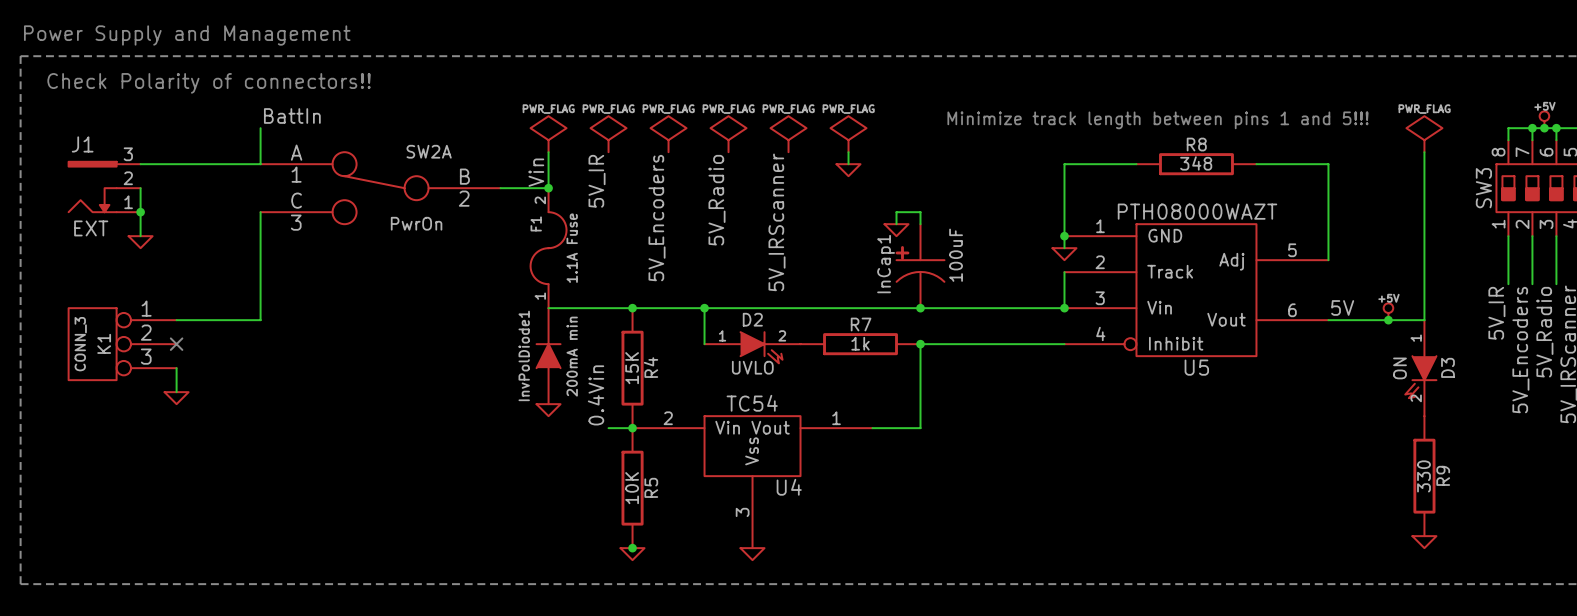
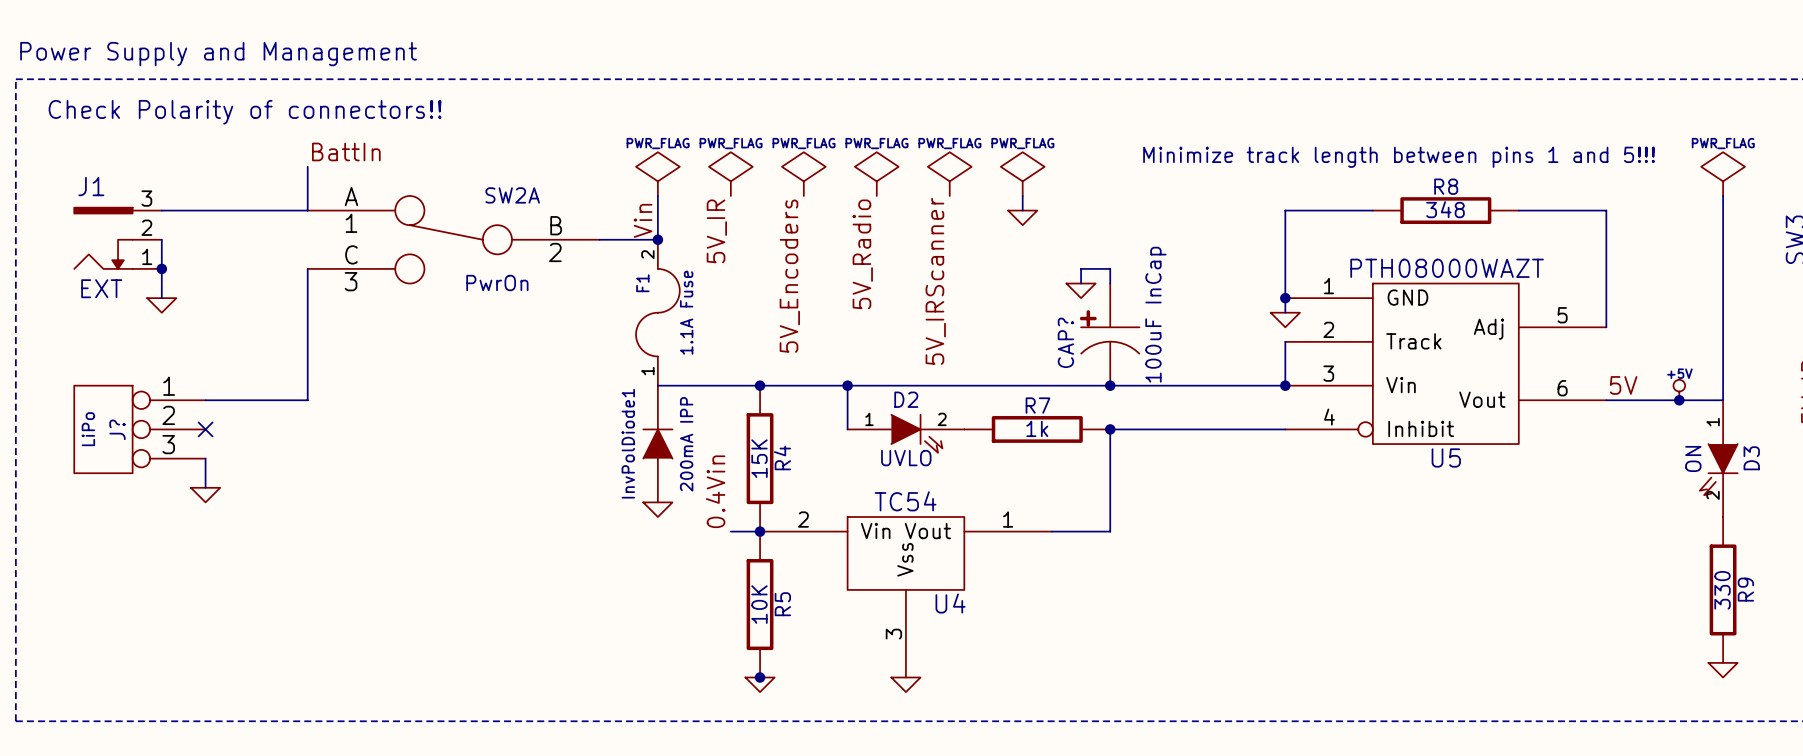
InCap1 value: 100uF (956, 255) -> 100uF InCap (1155, 314)
InCap1 name: InCap1 (886, 264) -> CAP? (1065, 342)
K1 name: K1 (104, 343) -> J? (117, 429)
K1 value: CONN_3 (80, 344) -> LiPo (88, 429)
InvPolDiode1 value: 200mA min (572, 356) -> 200mA IPP (686, 444)

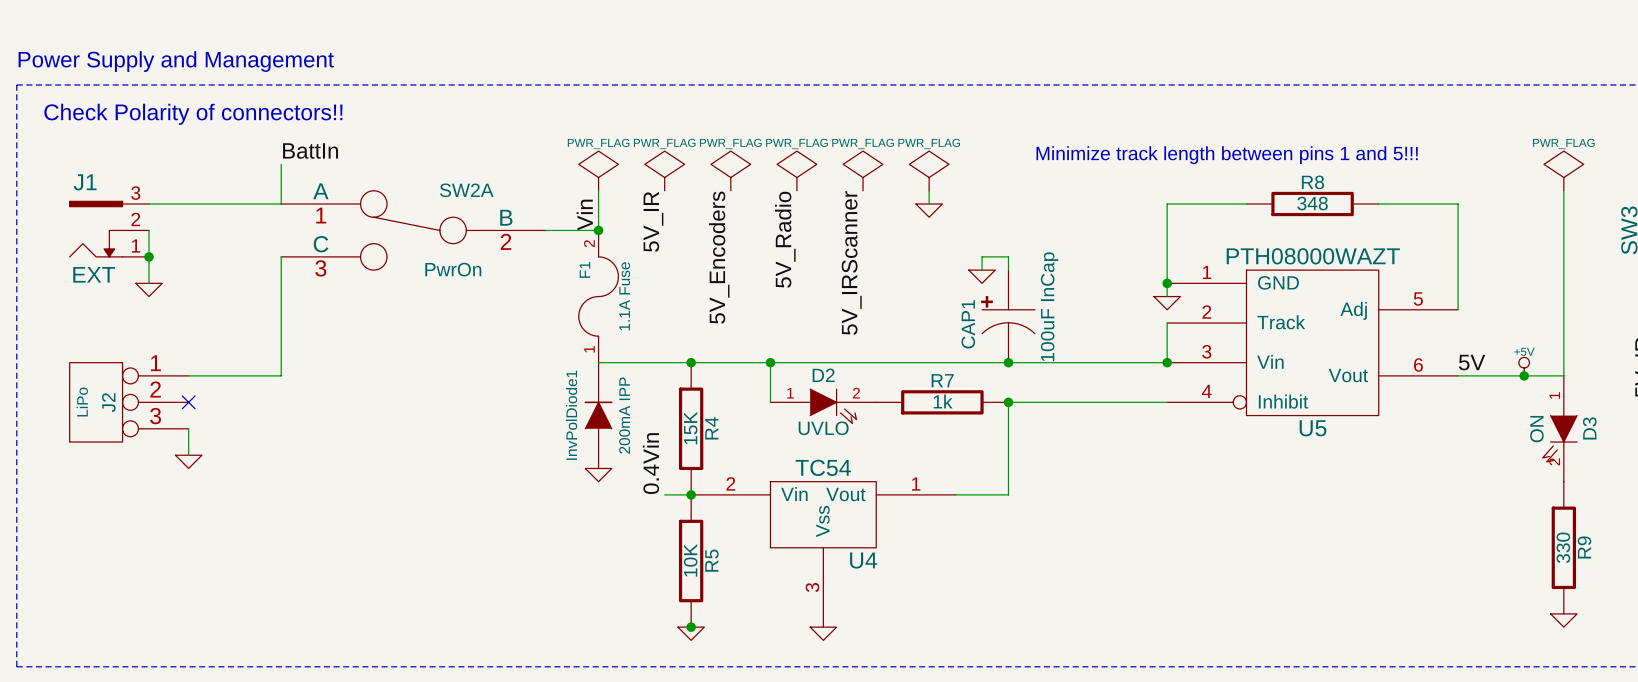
CAP? name: CAP? (1065, 342) -> CAP1 (968, 324)
J? name: J? (117, 429) -> J2 (108, 402)

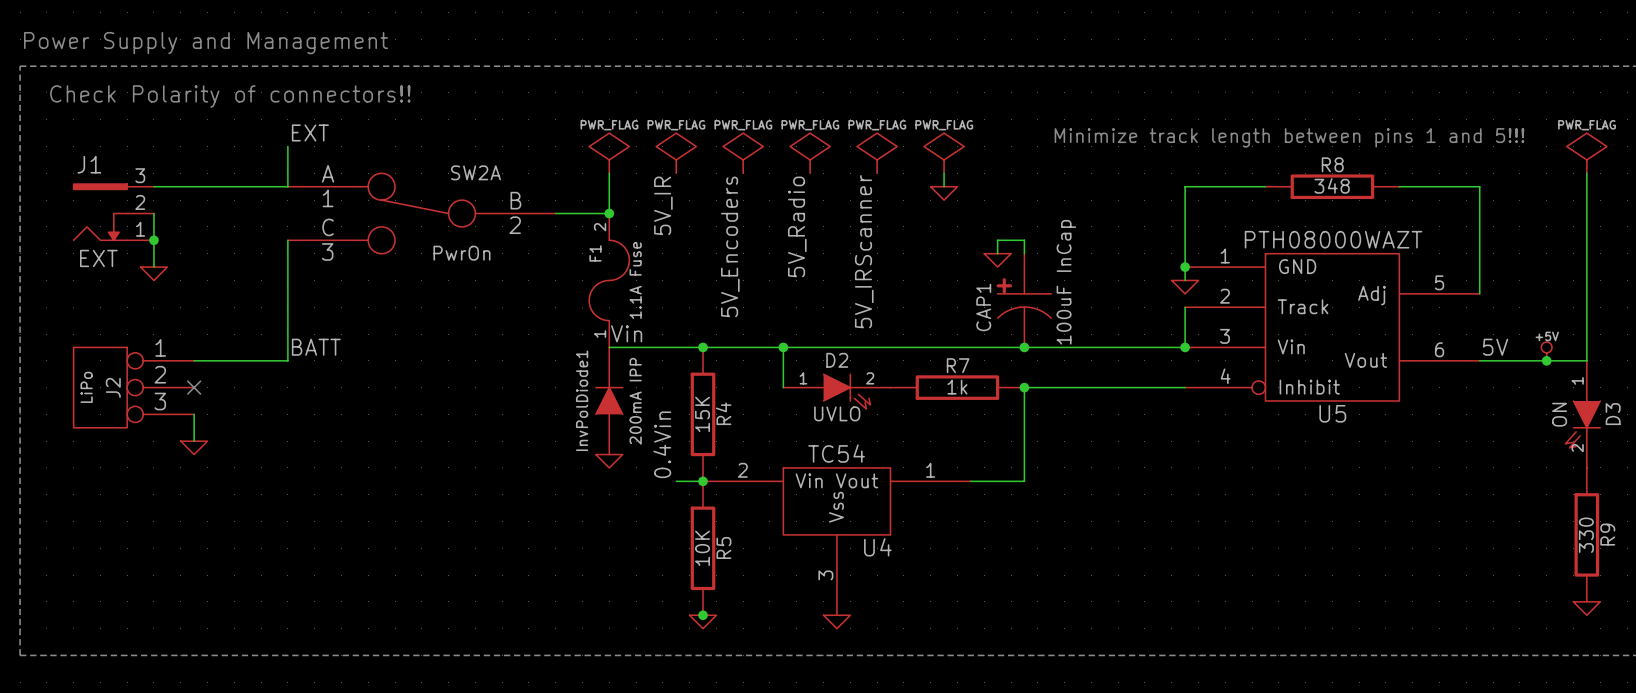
label: BattIn (310, 151) -> EXT (310, 132)
label rotation: 0° (584, 215) -> 90° clockwise (626, 333)
label position: Vin (584, 215) -> Vin (626, 333)
label: none -> BATT (316, 347)

